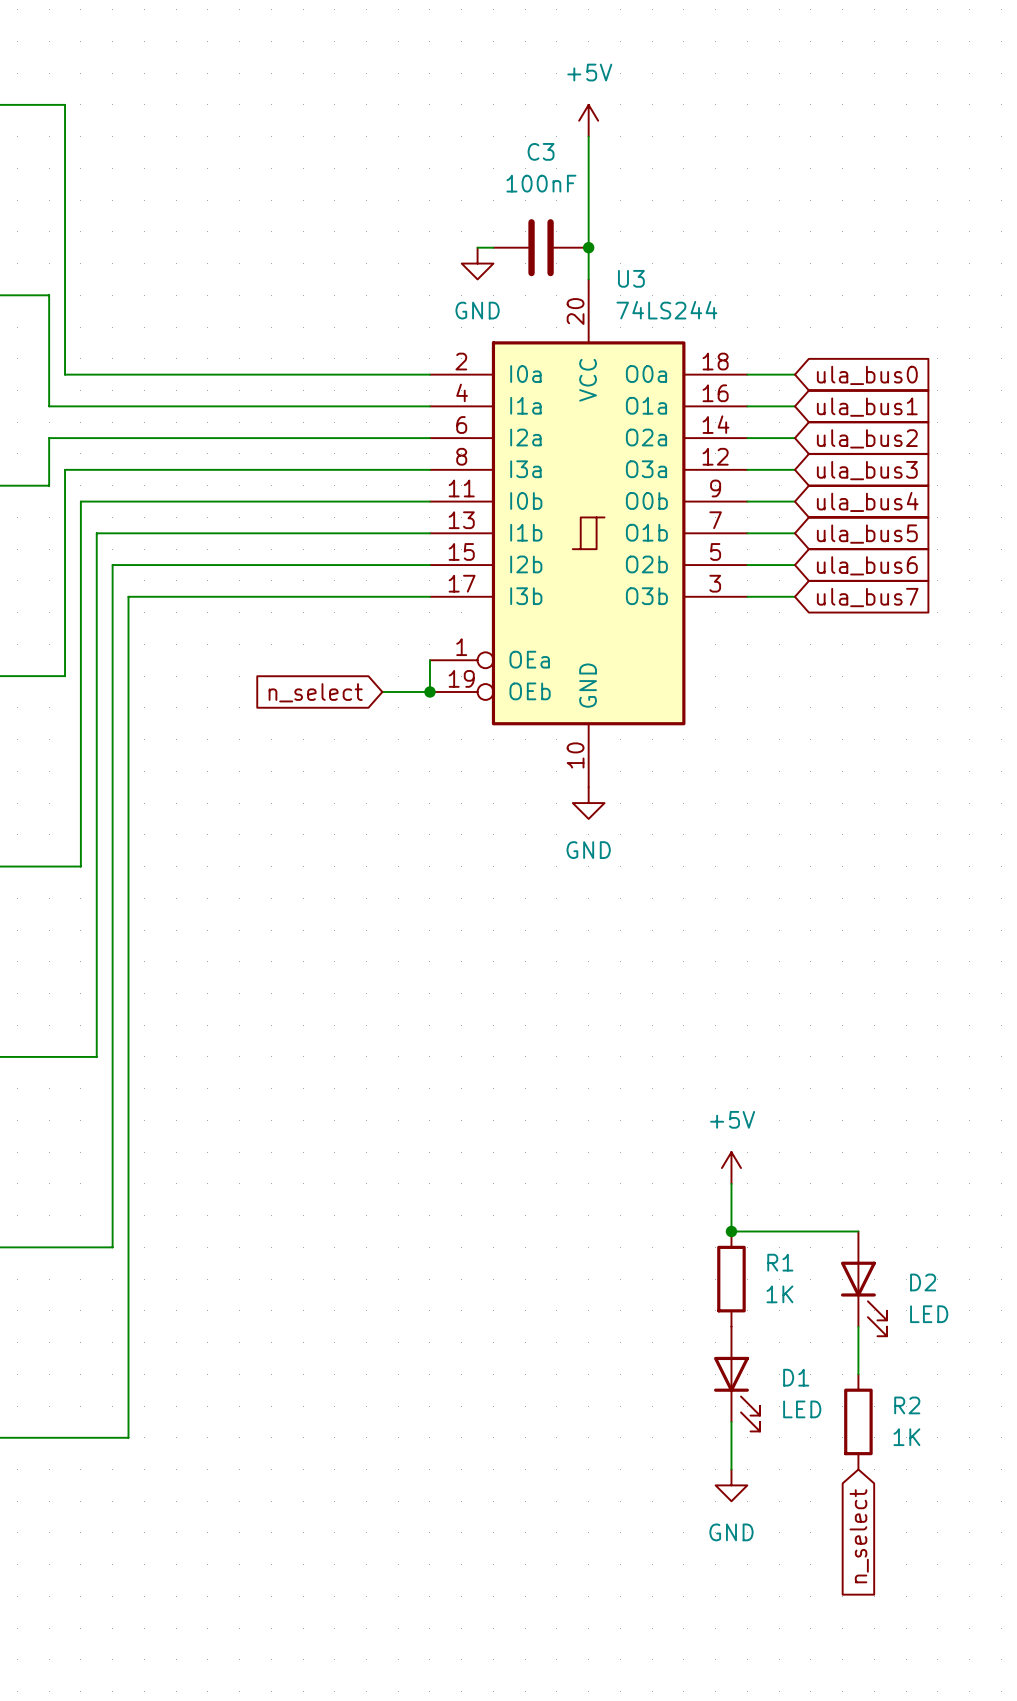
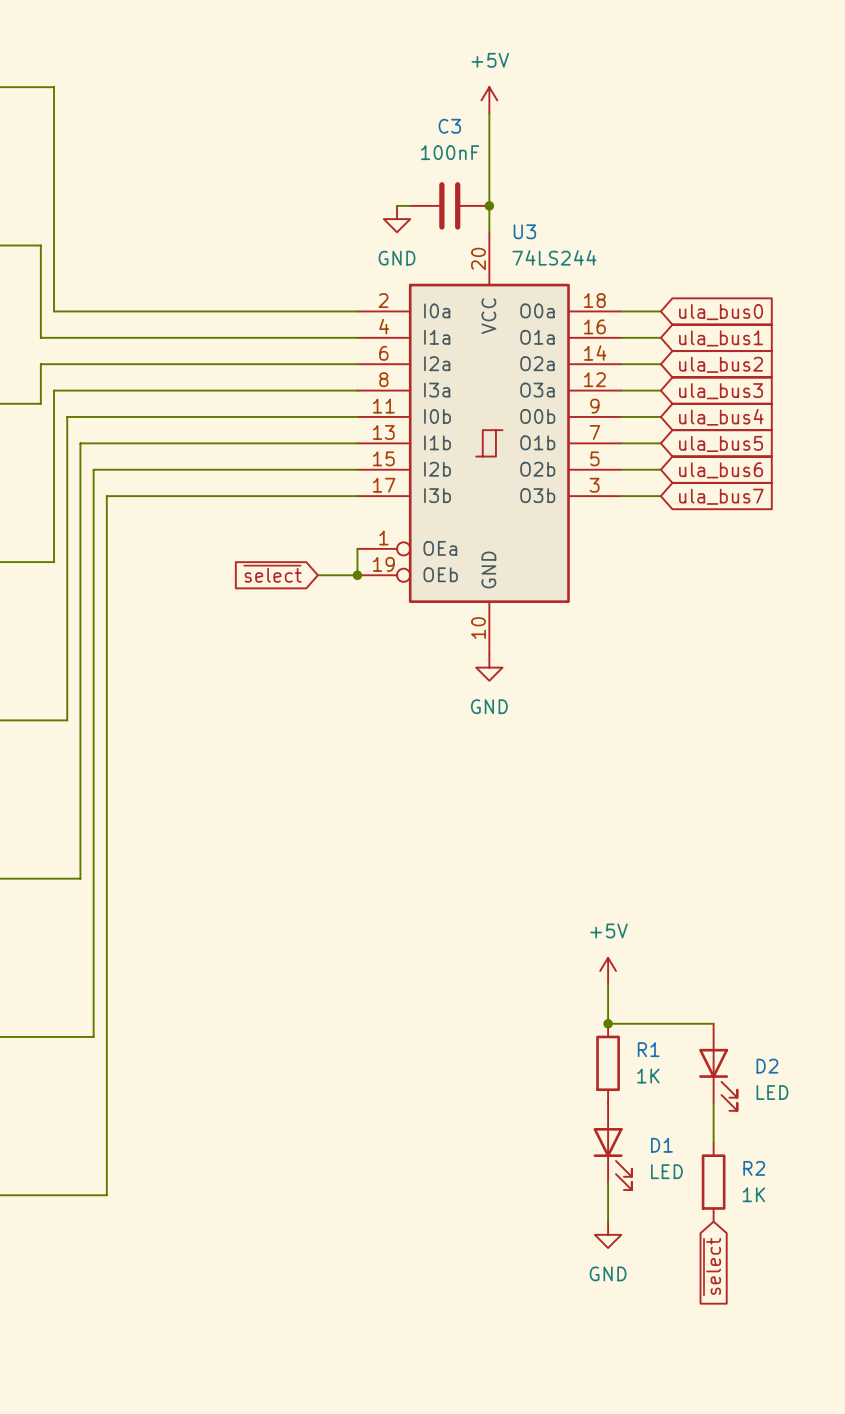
global label: n_select (315, 692) -> ~{select} (272, 573)
global label: n_select (859, 1536) -> ~{select} (712, 1267)

